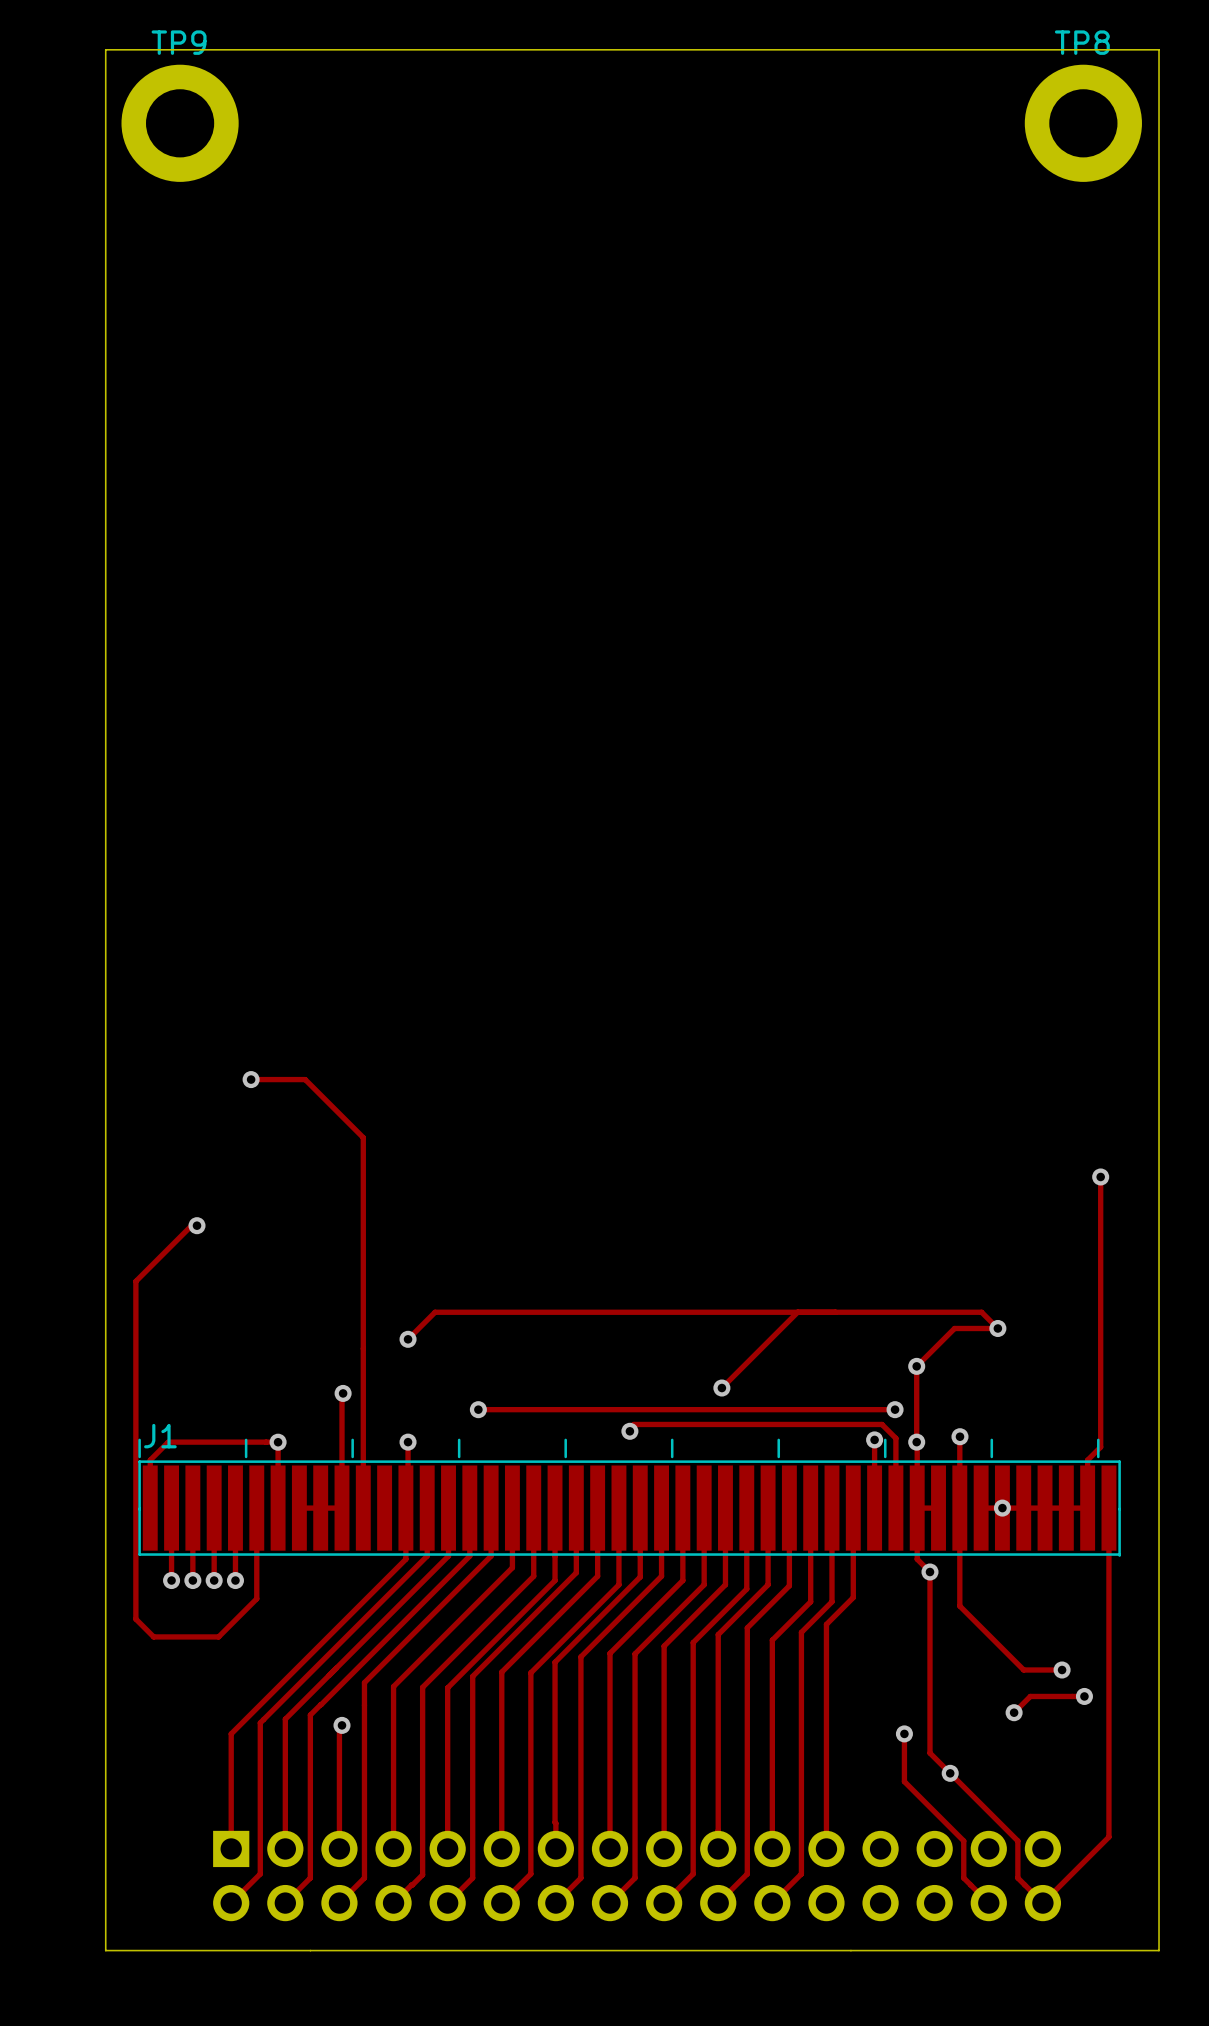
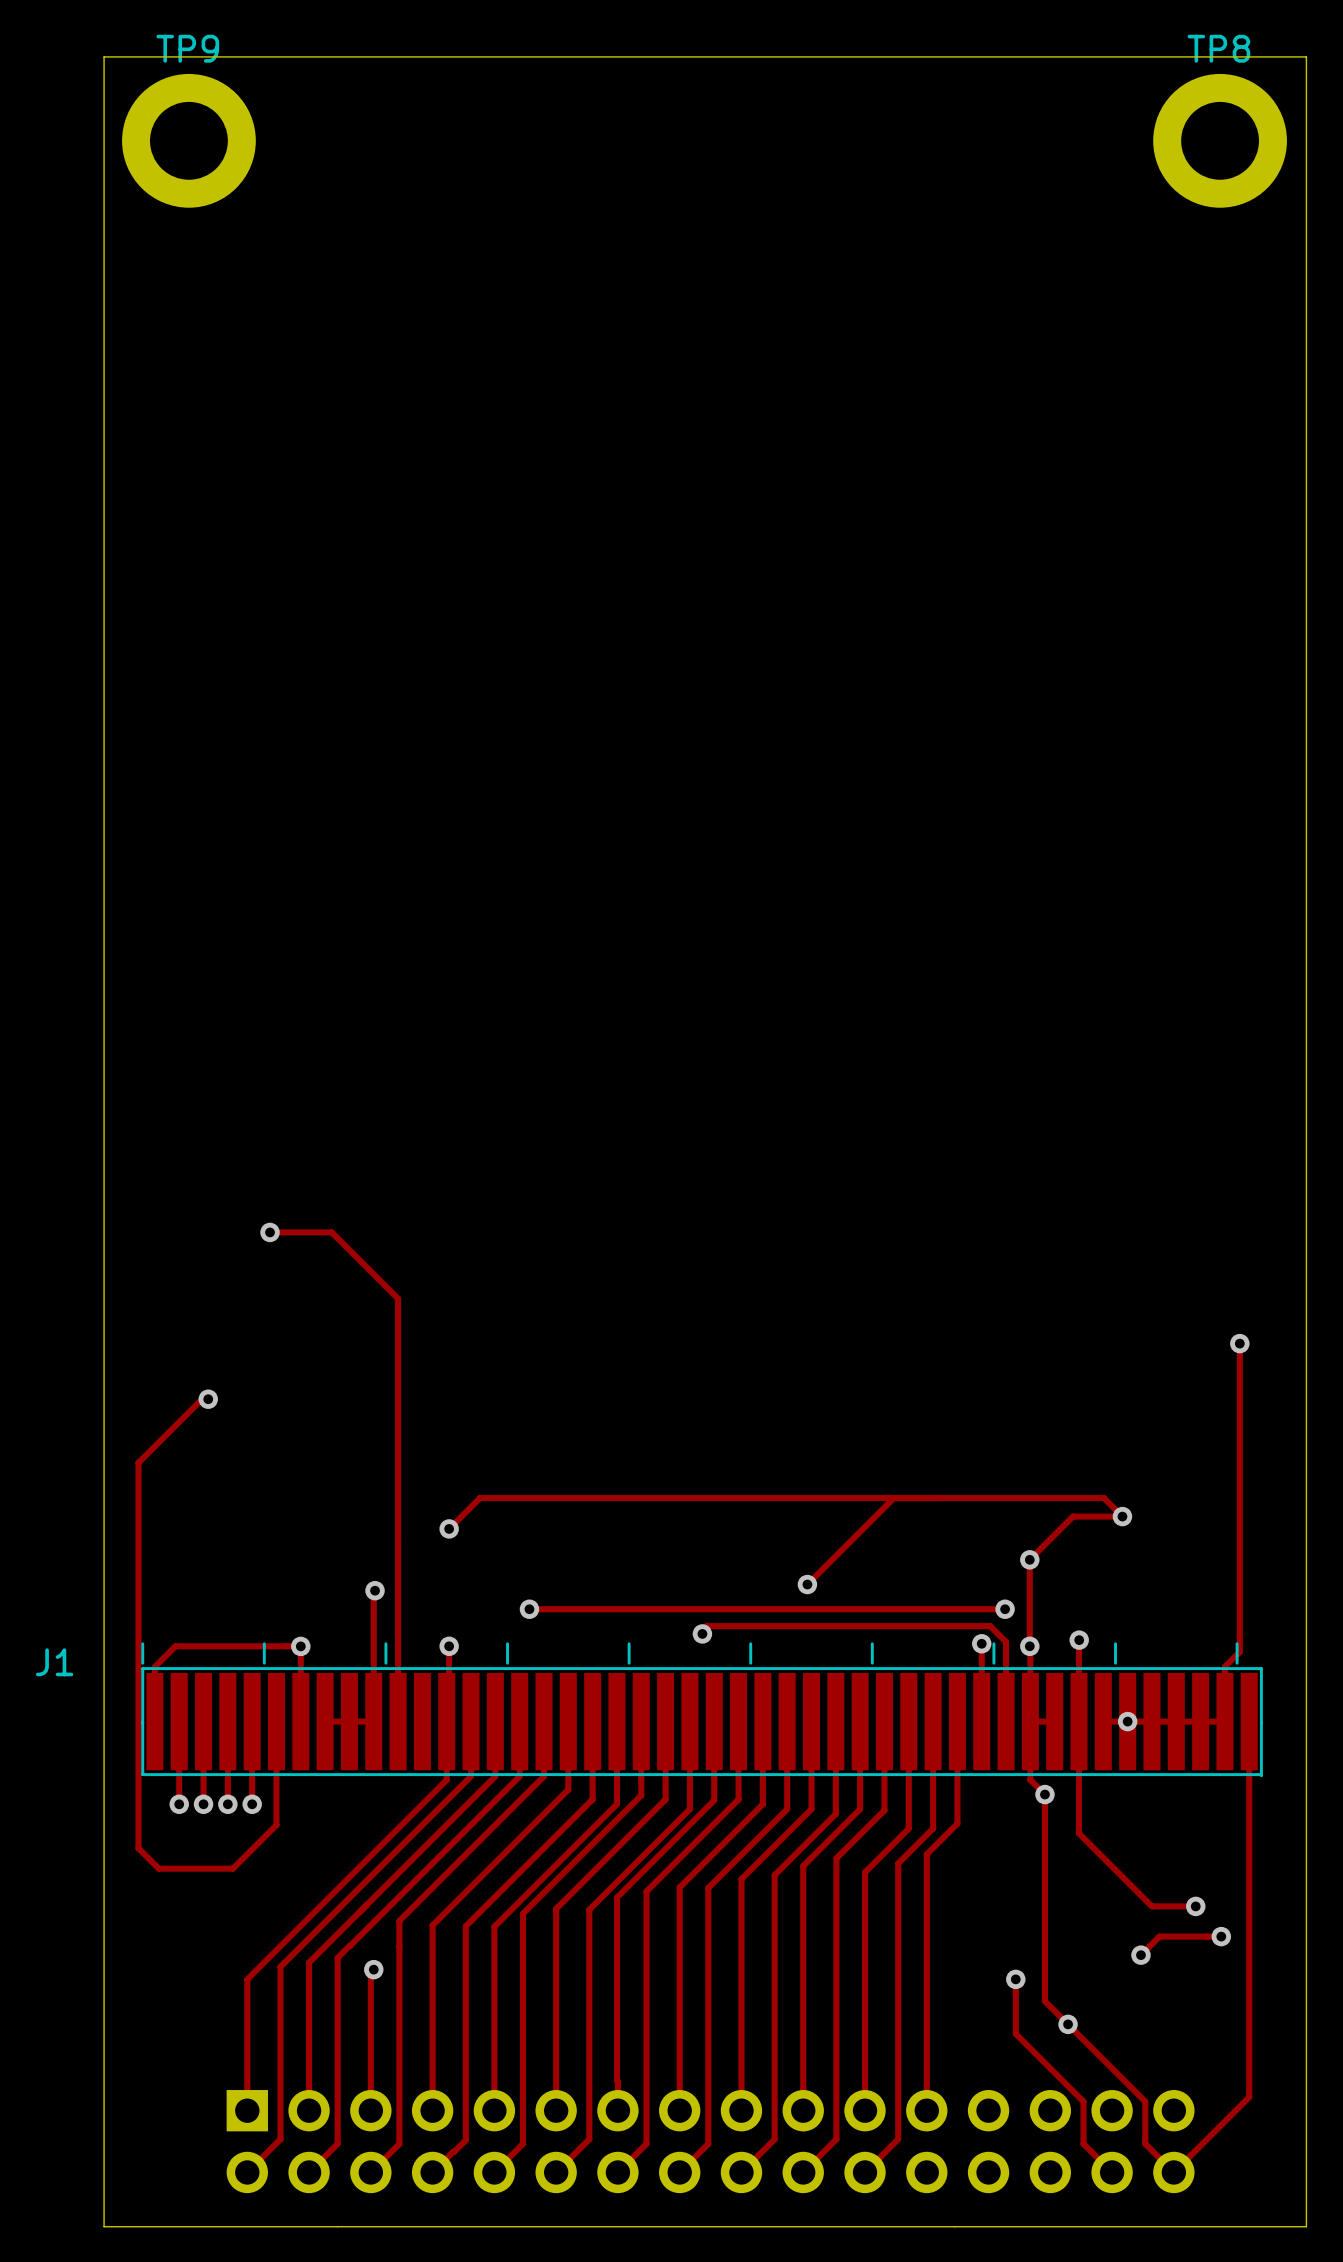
J1 name position: J1 (160, 1436) -> J1 (54, 1662)

